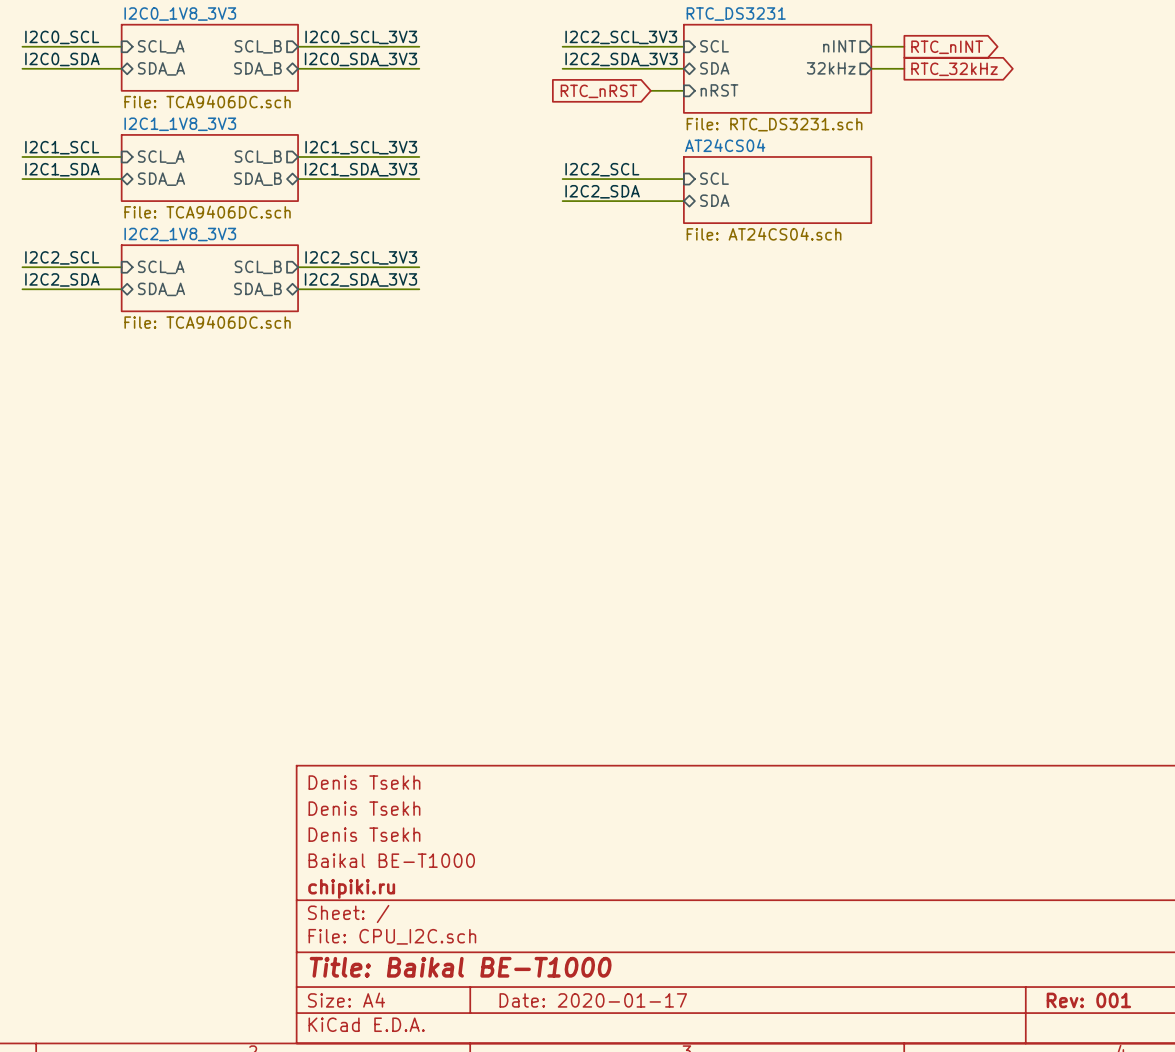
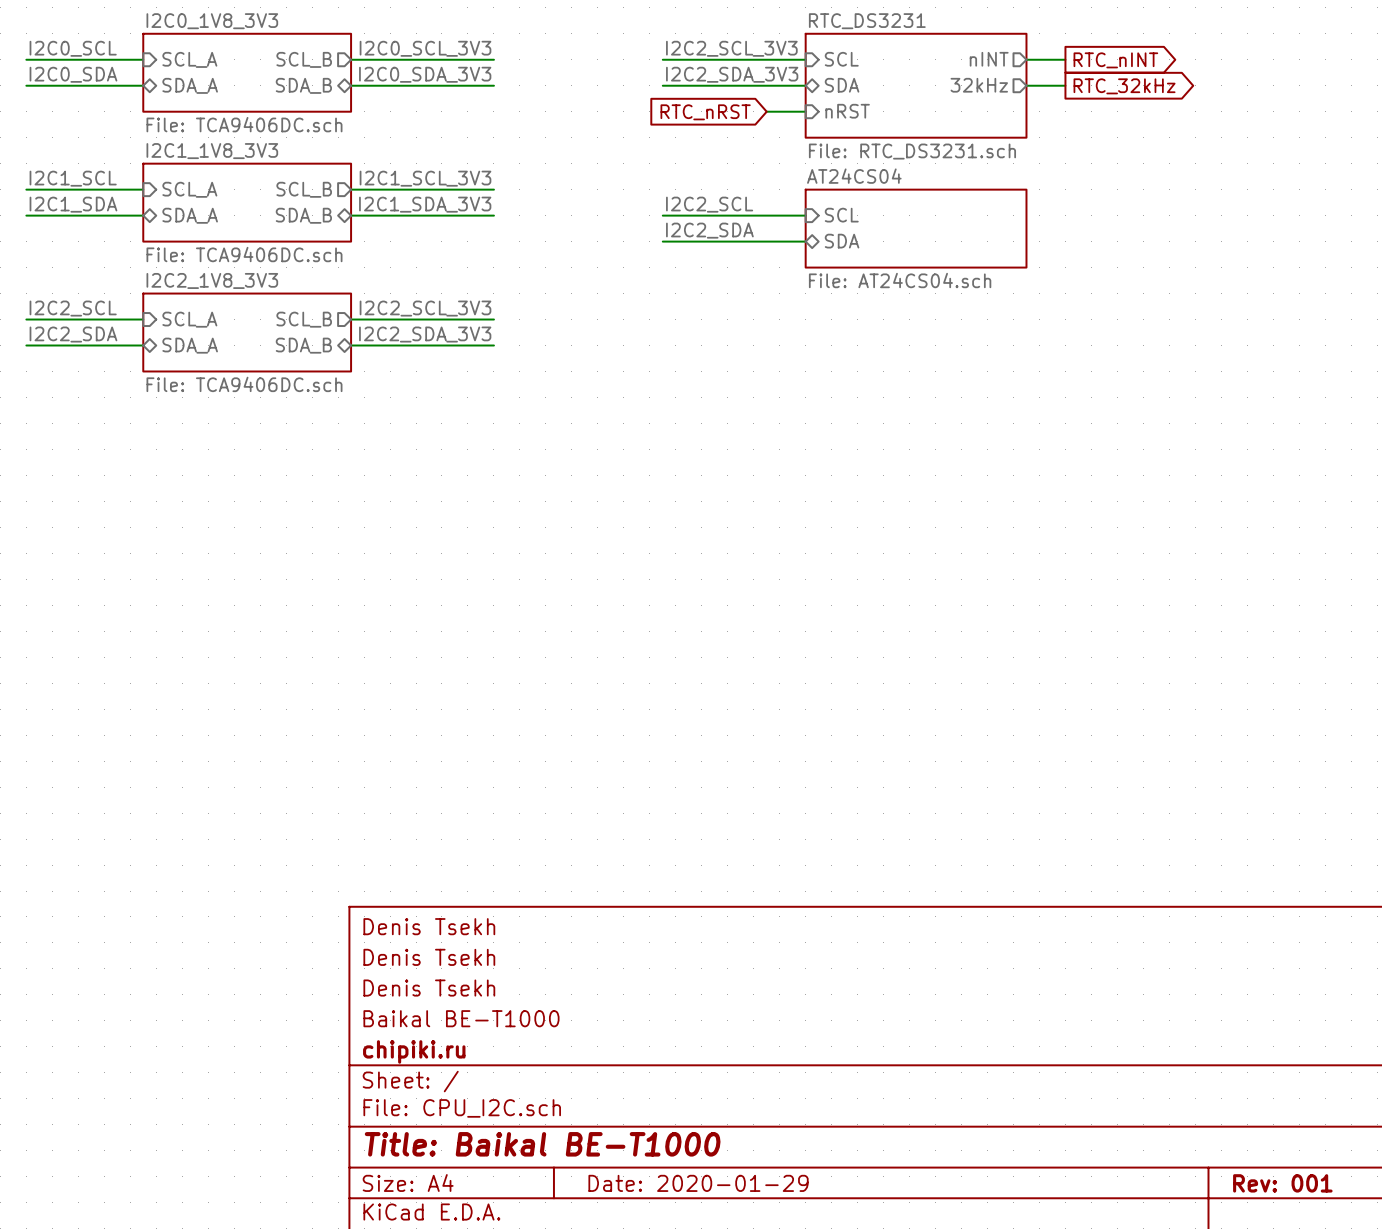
title block: Date: 2020-01-17 (593, 1000) -> Date: 2020-01-29 (698, 1183)

